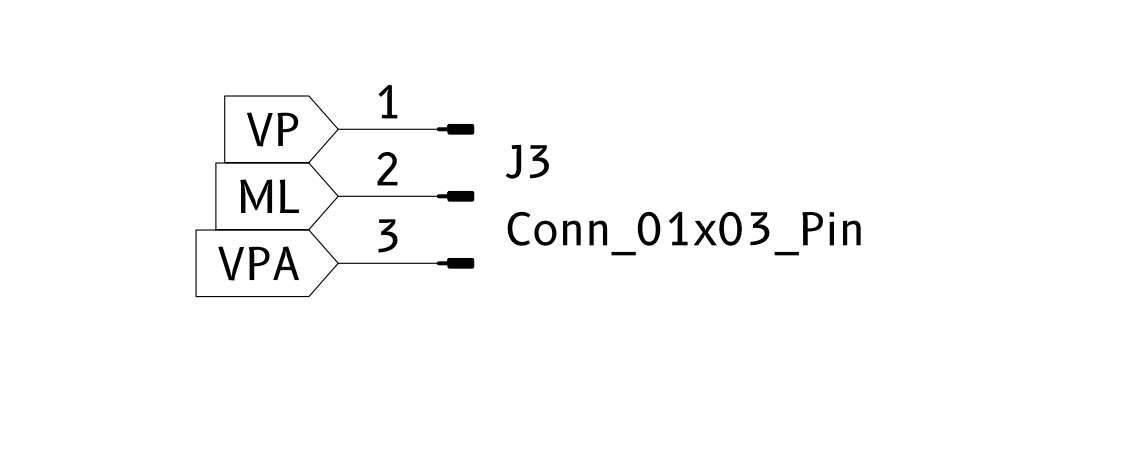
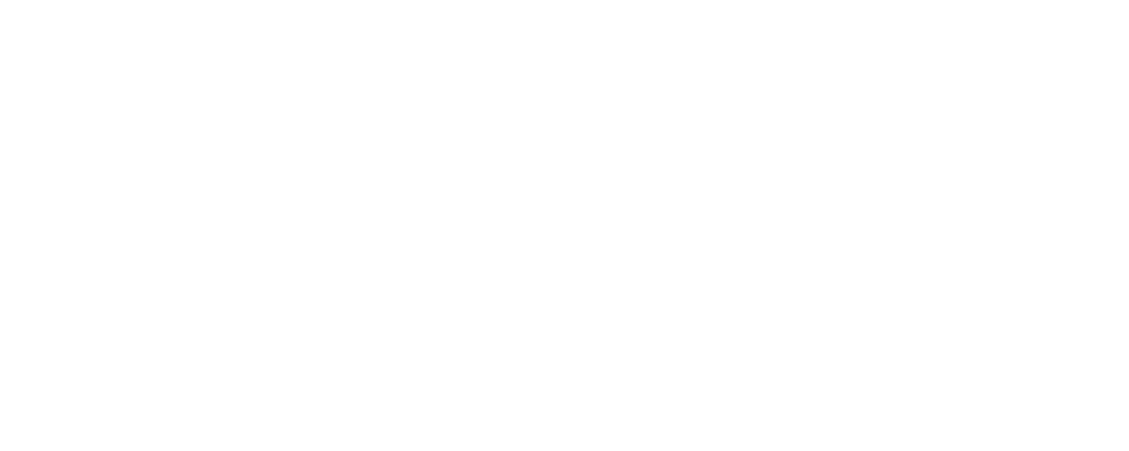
global label: VP (272, 129) -> none
global label: ML (269, 196) -> none
J3: Conn_01x03_Pin (406, 196) -> none
global label: VPA (258, 263) -> none

